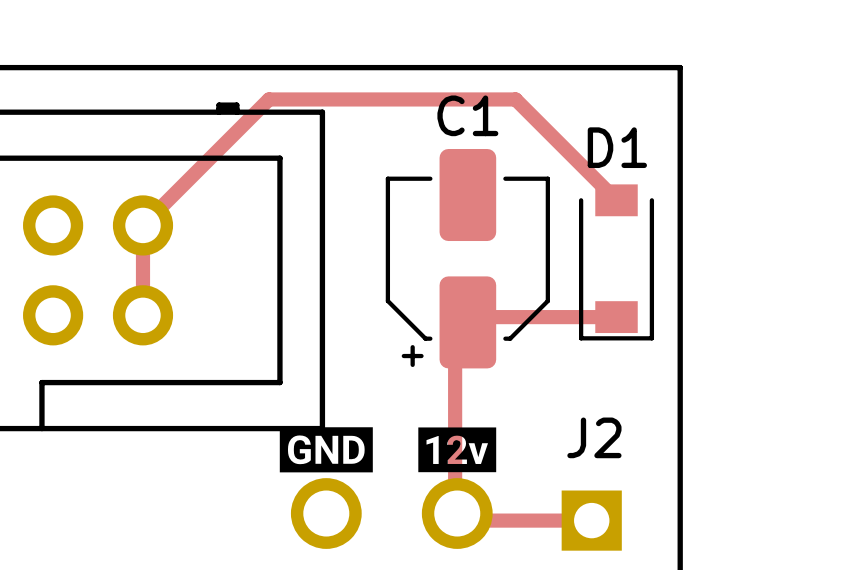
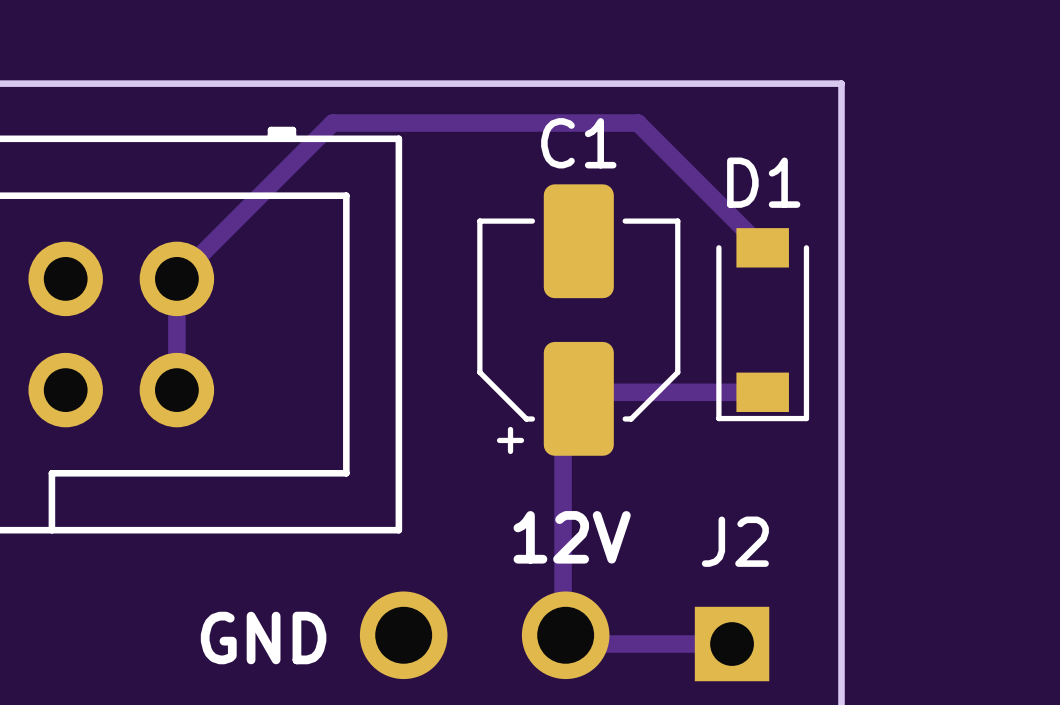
drawing: [279, 427, 373, 473] -> none
drawing: [418, 427, 497, 473] -> none
text: none -> 12V (572, 537)
text: none -> GND (263, 638)

